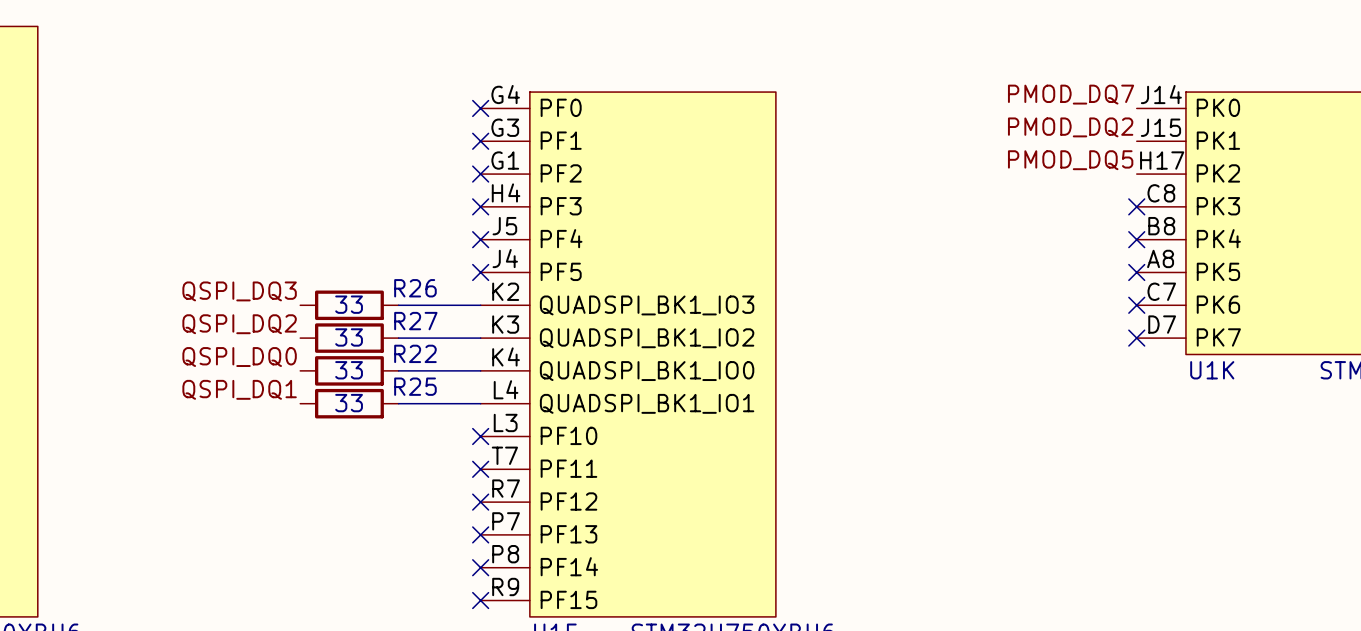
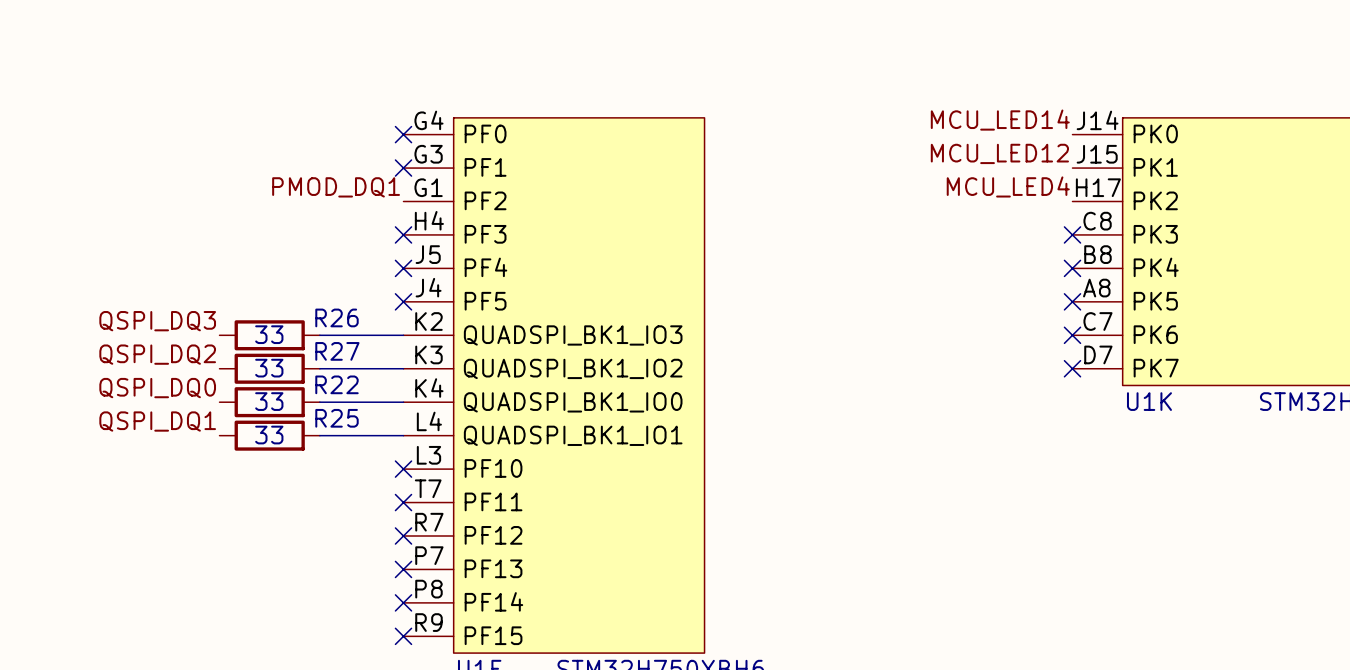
label: PMOD_DQ7 (1071, 94) -> MCU_LED14 (1000, 120)
label: PMOD_DQ2 (1070, 127) -> MCU_LED12 (999, 153)
label: none -> PMOD_DQ1 (336, 187)
label: PMOD_DQ5 (1070, 160) -> MCU_LED4 (1008, 186)
no-connect mark: (480, 174) -> none

